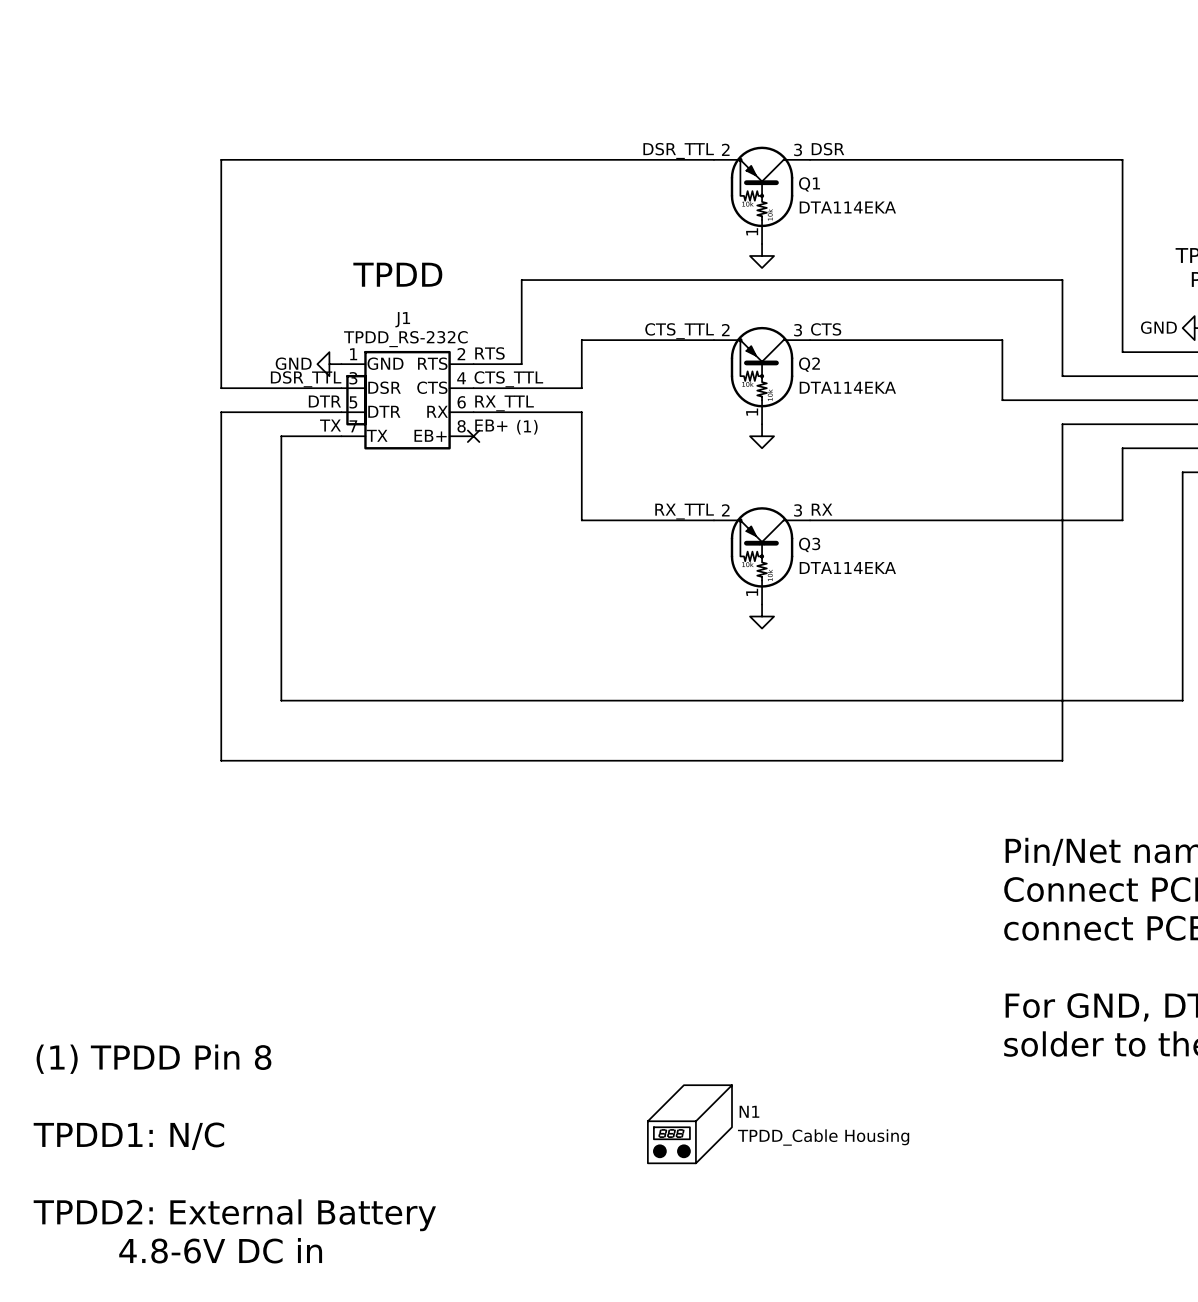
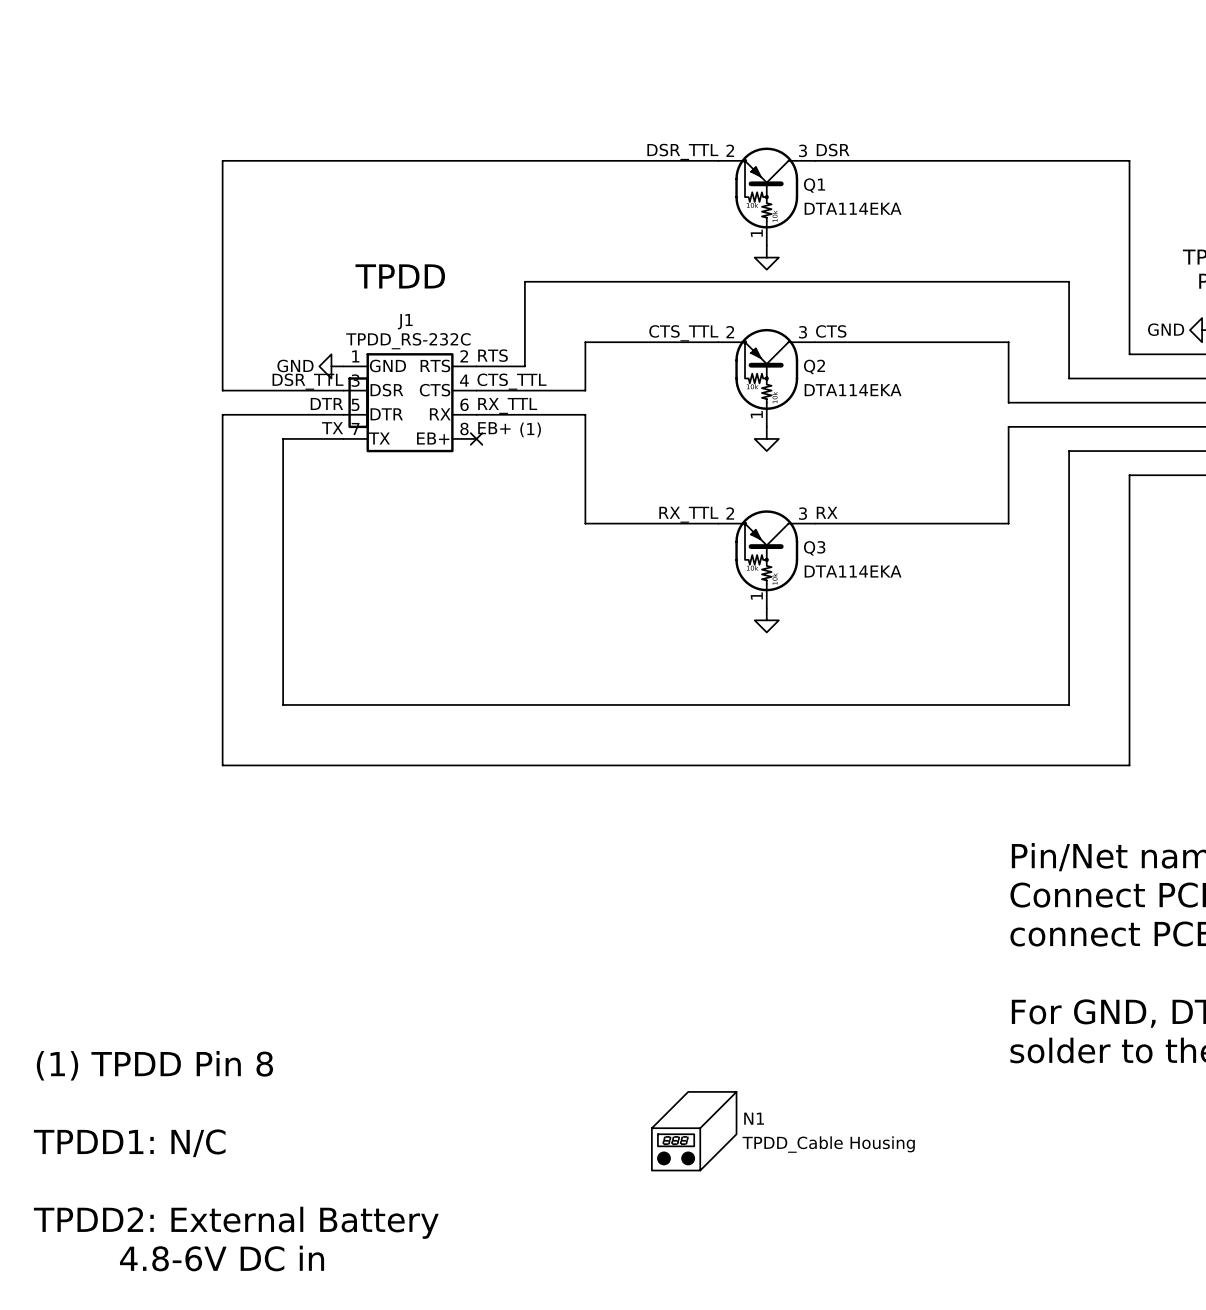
wire: (1062, 424) (1062, 448) -> (1069, 426) (1008, 426) (1008, 523)
wire: (1122, 448) (1122, 472) -> (1129, 451) (1069, 451)
wire: none -> (1129, 475) (1189, 475)
wire: (1182, 472) (1182, 700) (1062, 700) (1062, 760) -> (1129, 523) (1129, 765) (1069, 765)
wire: (1002, 520) (1122, 520) -> none

